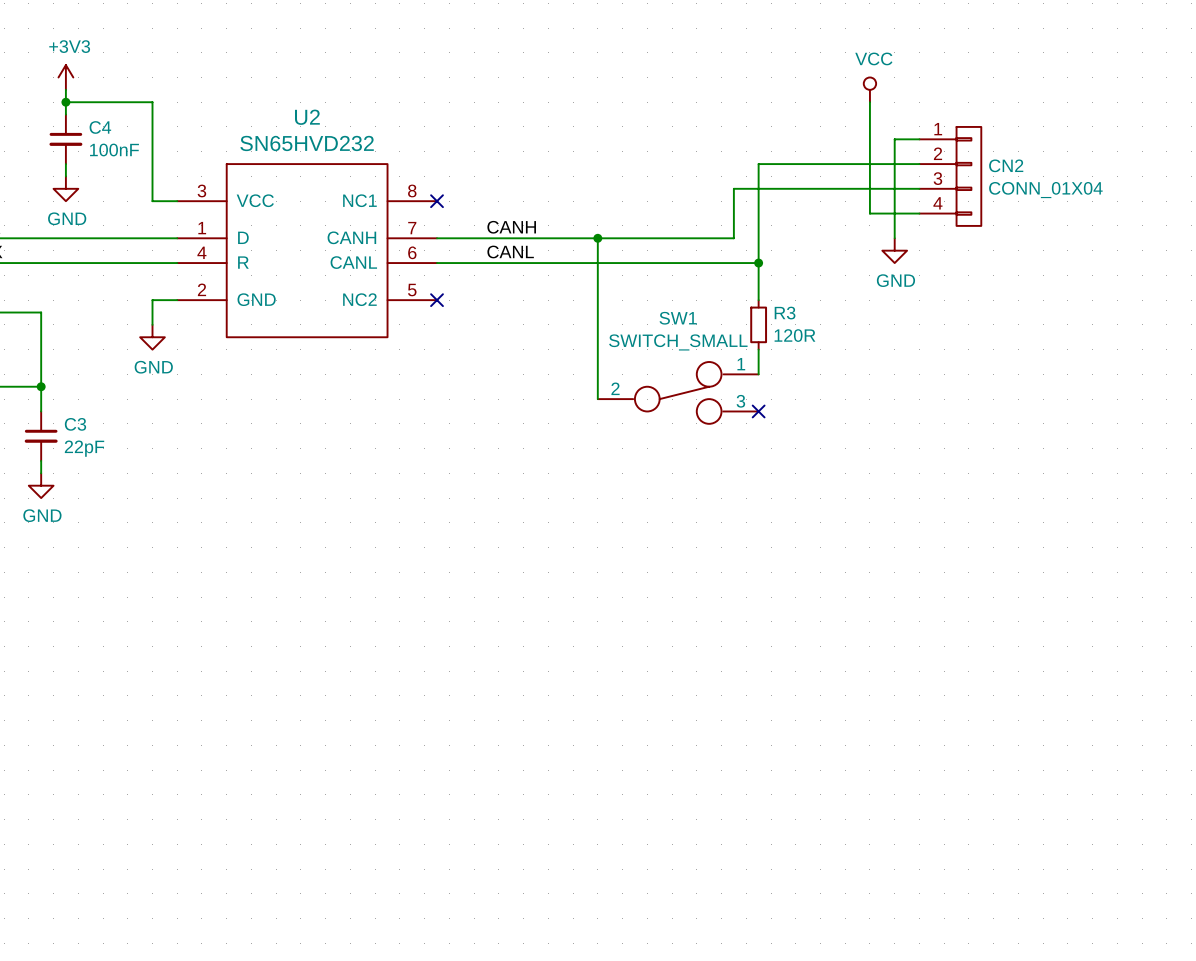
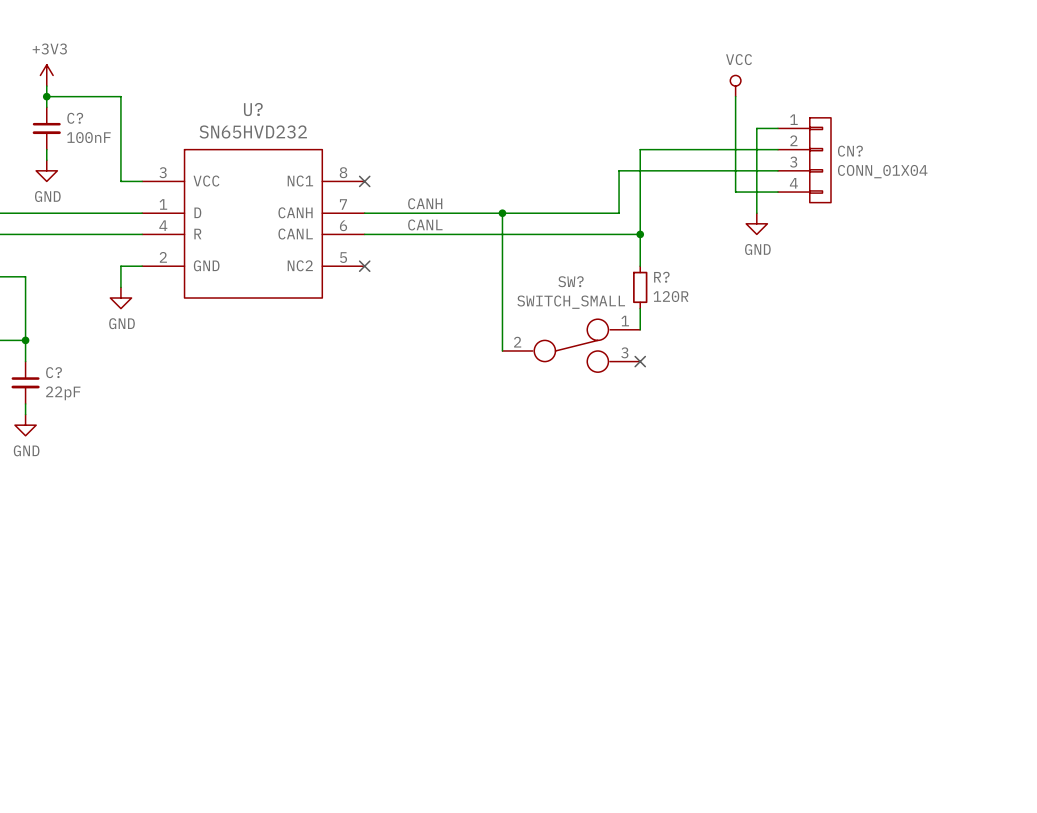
U2 name: U2 (307, 117) -> U? (253, 109)
C4 name: C4 (100, 127) -> C? (75, 118)
CN2 name: CN2 (1006, 165) -> CN? (850, 151)
R3 name: R3 (785, 313) -> R? (661, 277)
SW1 name: SW1 (678, 318) -> SW? (571, 281)
C3 name: C3 (75, 424) -> C? (54, 372)

